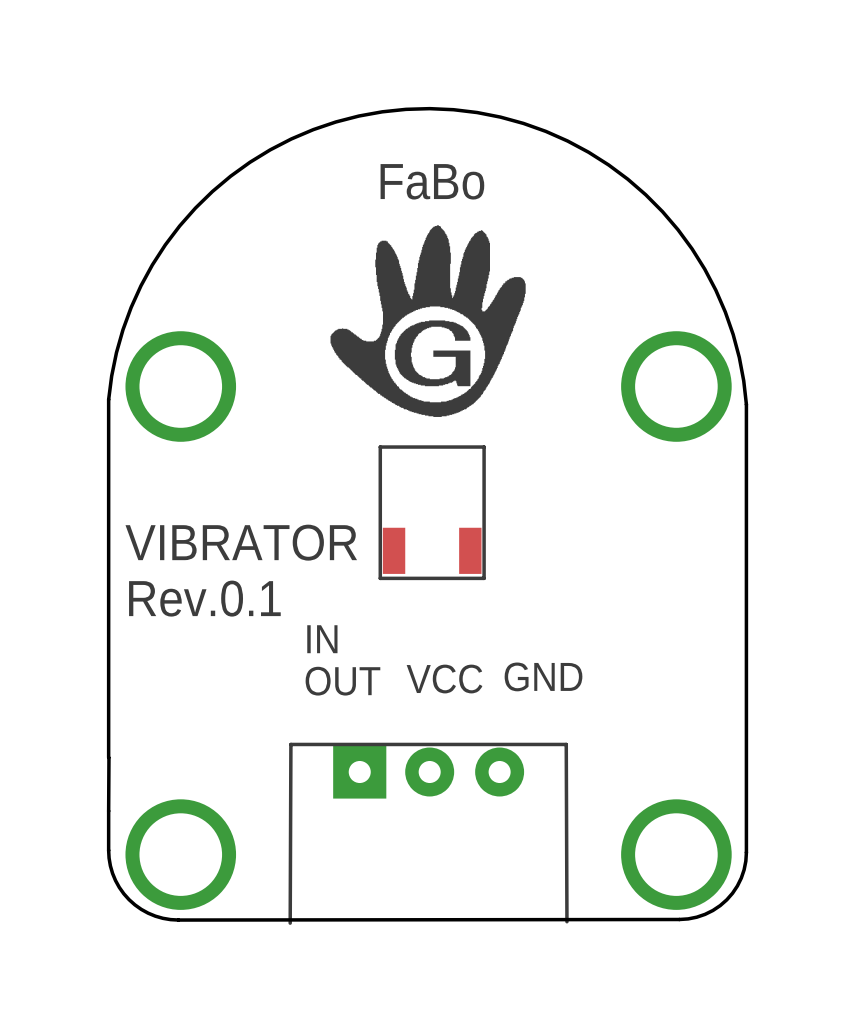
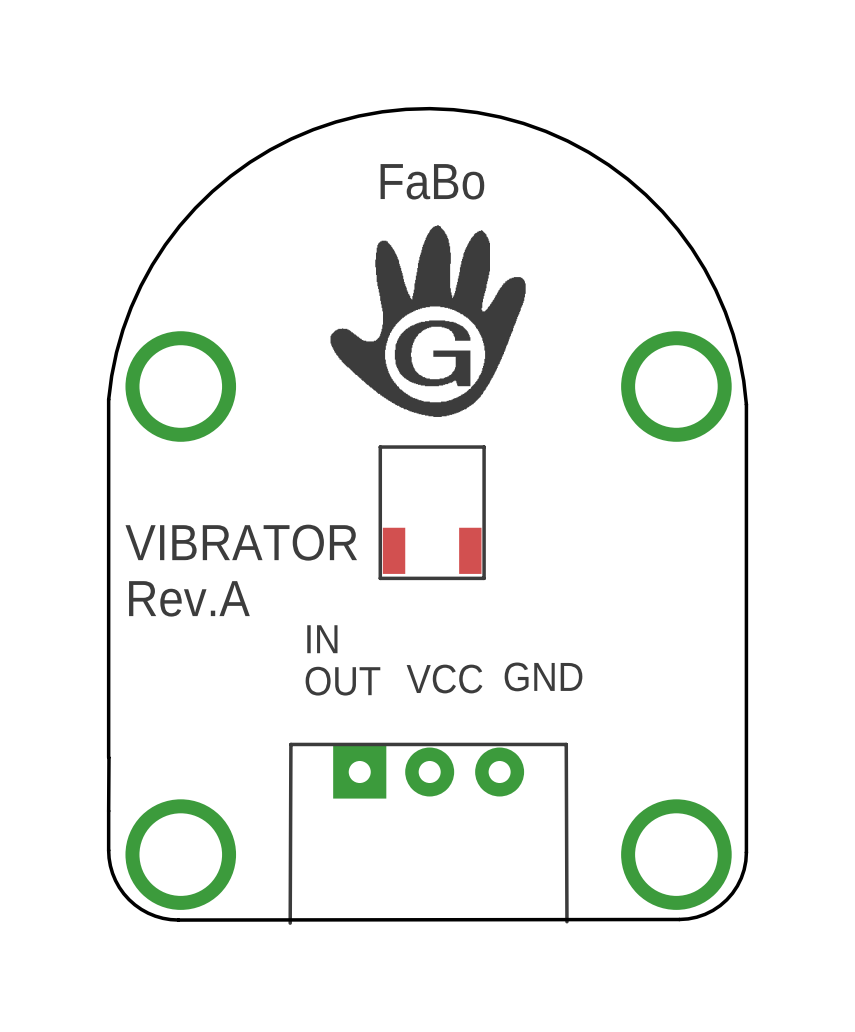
text: Rev.0.1 (204, 598) -> Rev.A (189, 598)

